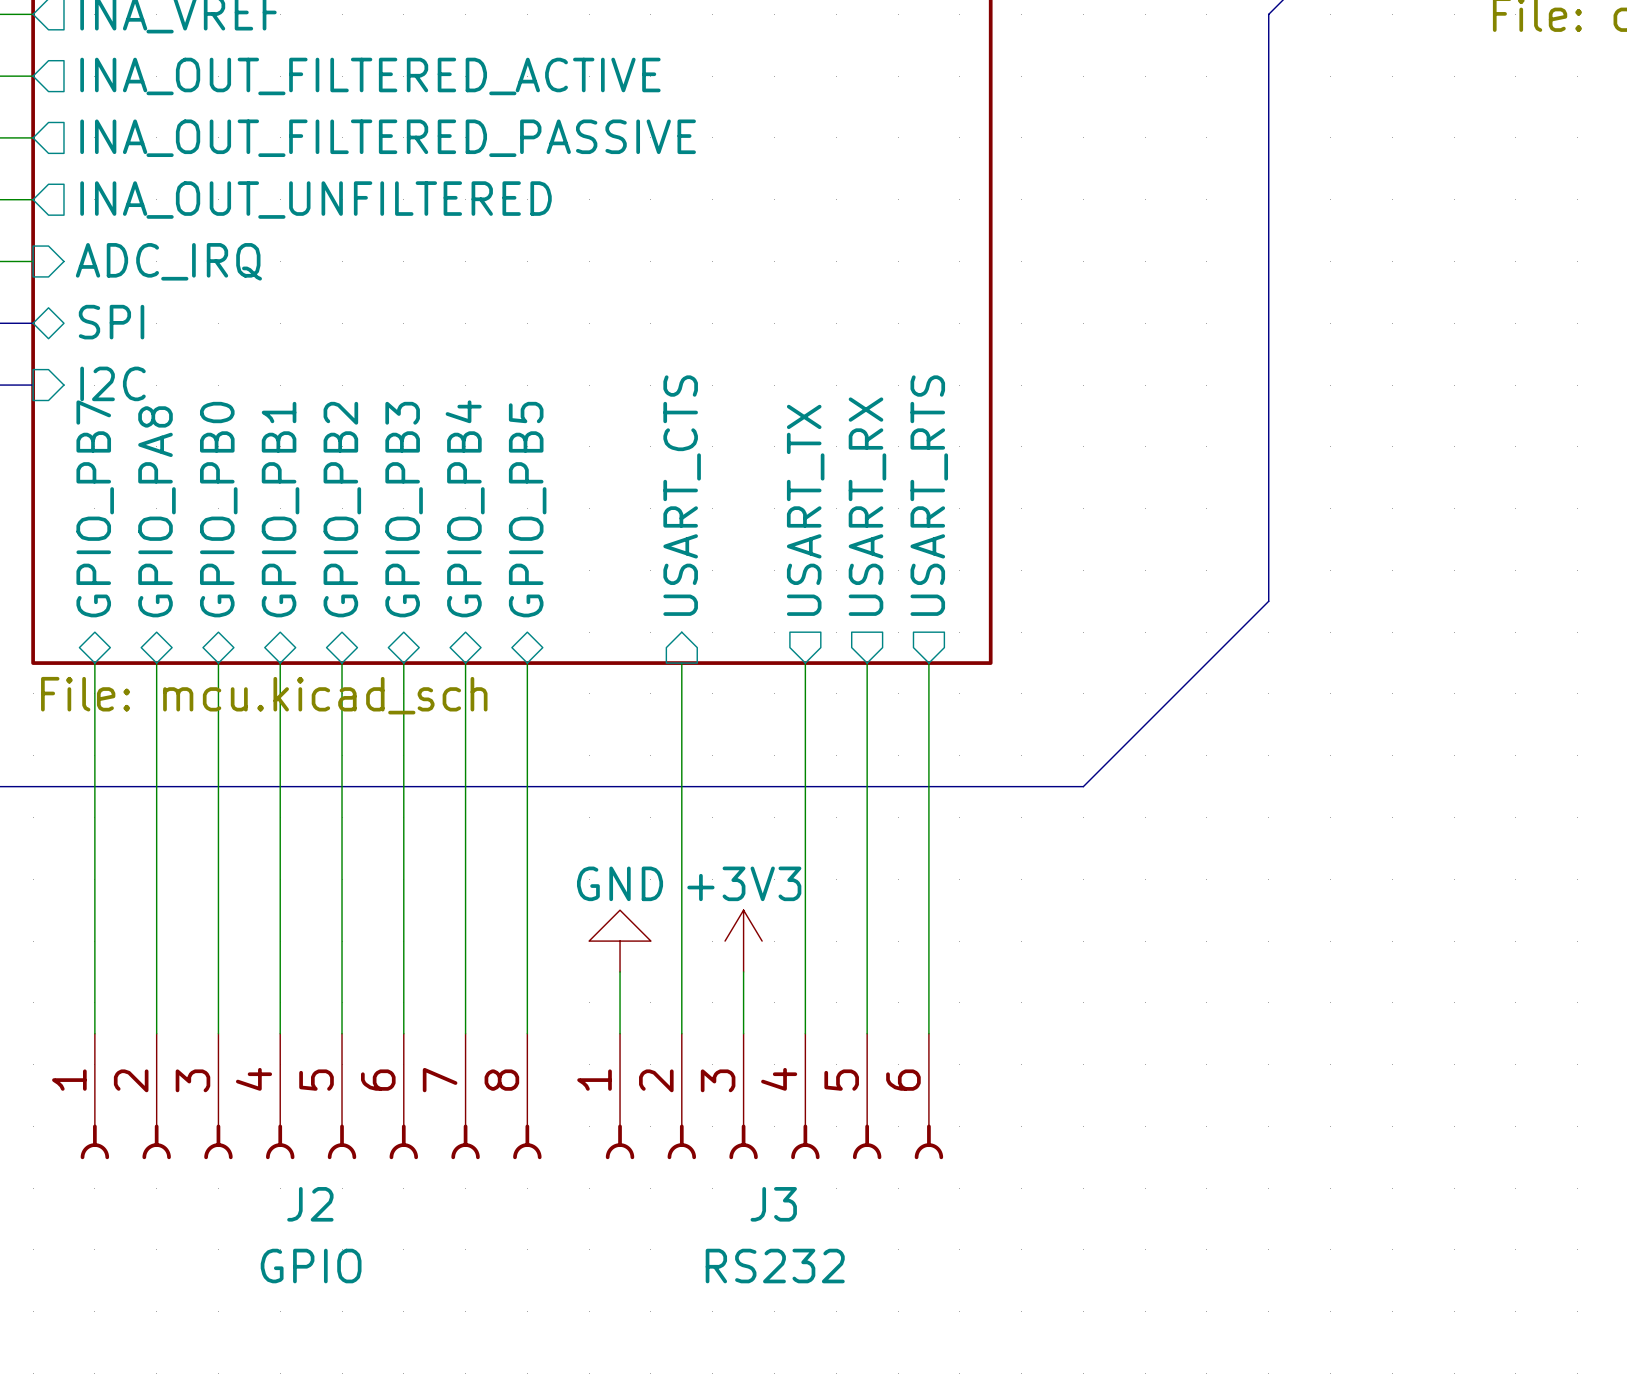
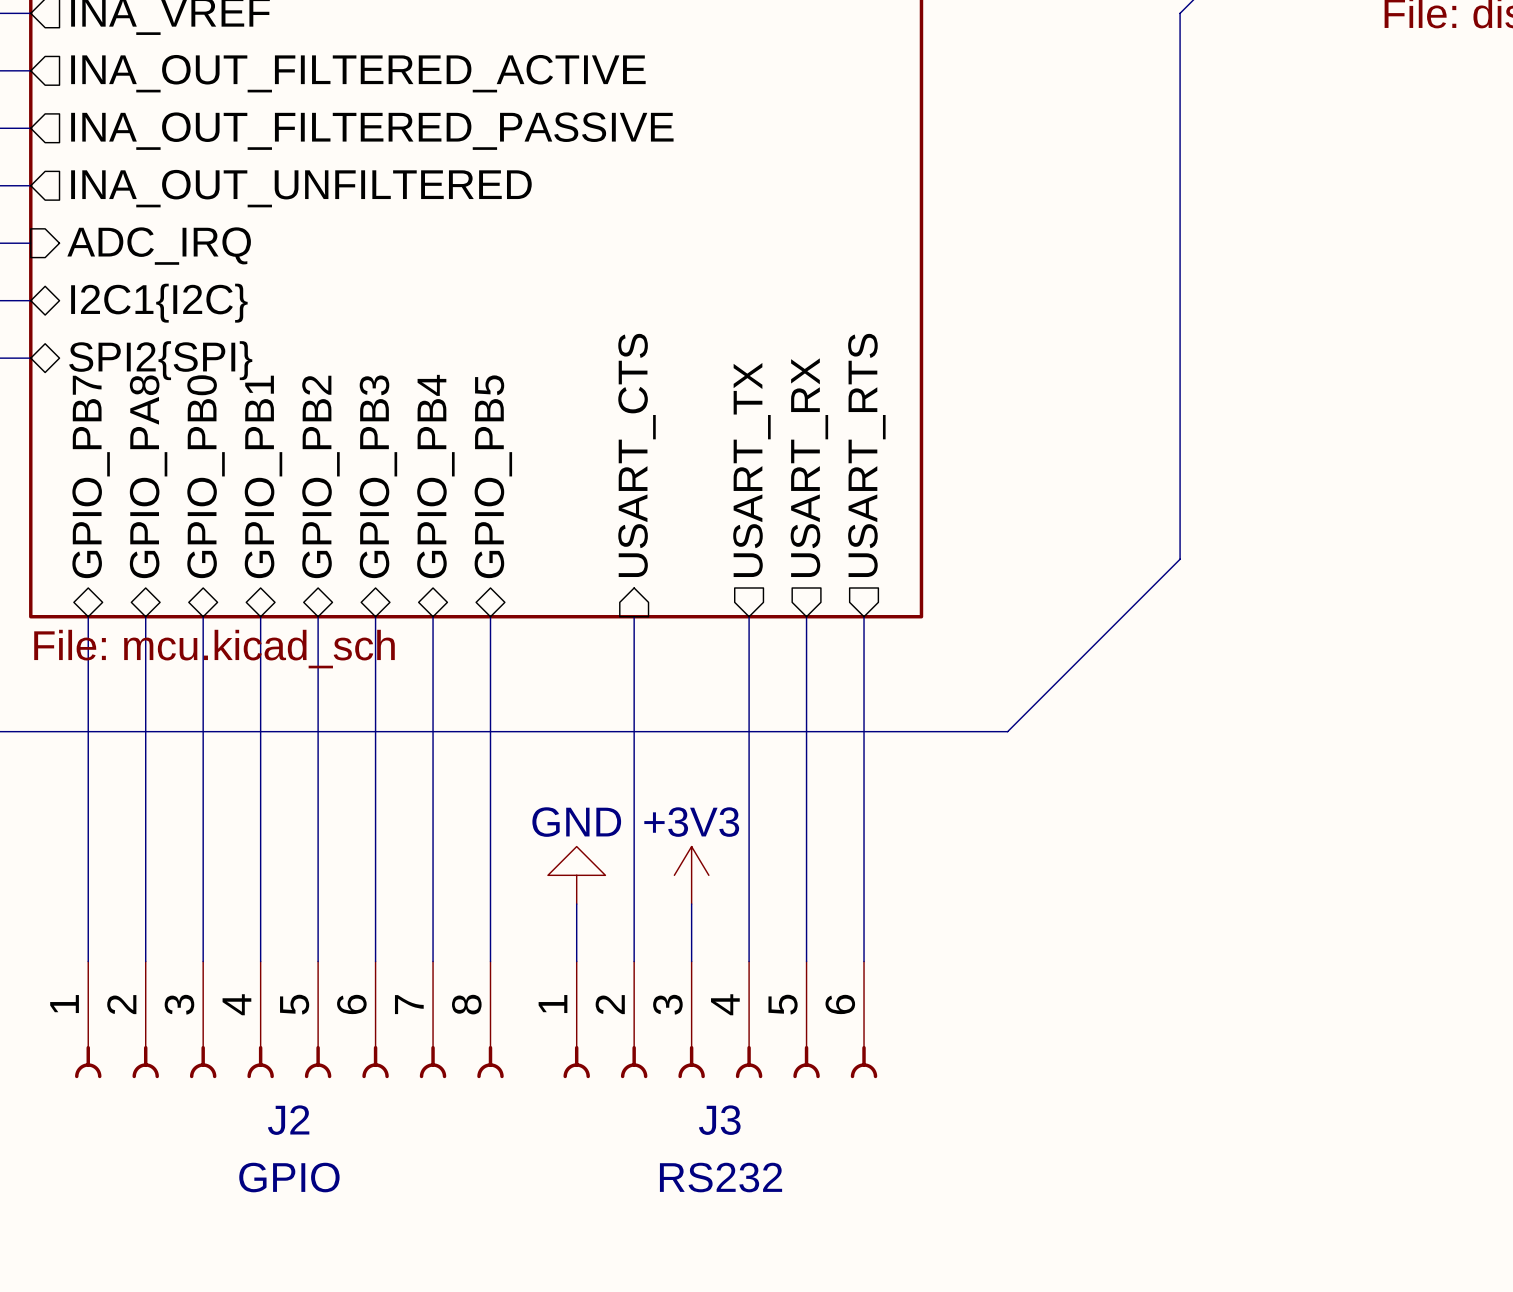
sheet pin: SPI (111, 322) -> I2C1{I2C} (159, 303)
sheet pin shape: input (113, 383) -> bidirectional (160, 360)
sheet pin: I2C (113, 383) -> SPI2{SPI} (160, 360)

